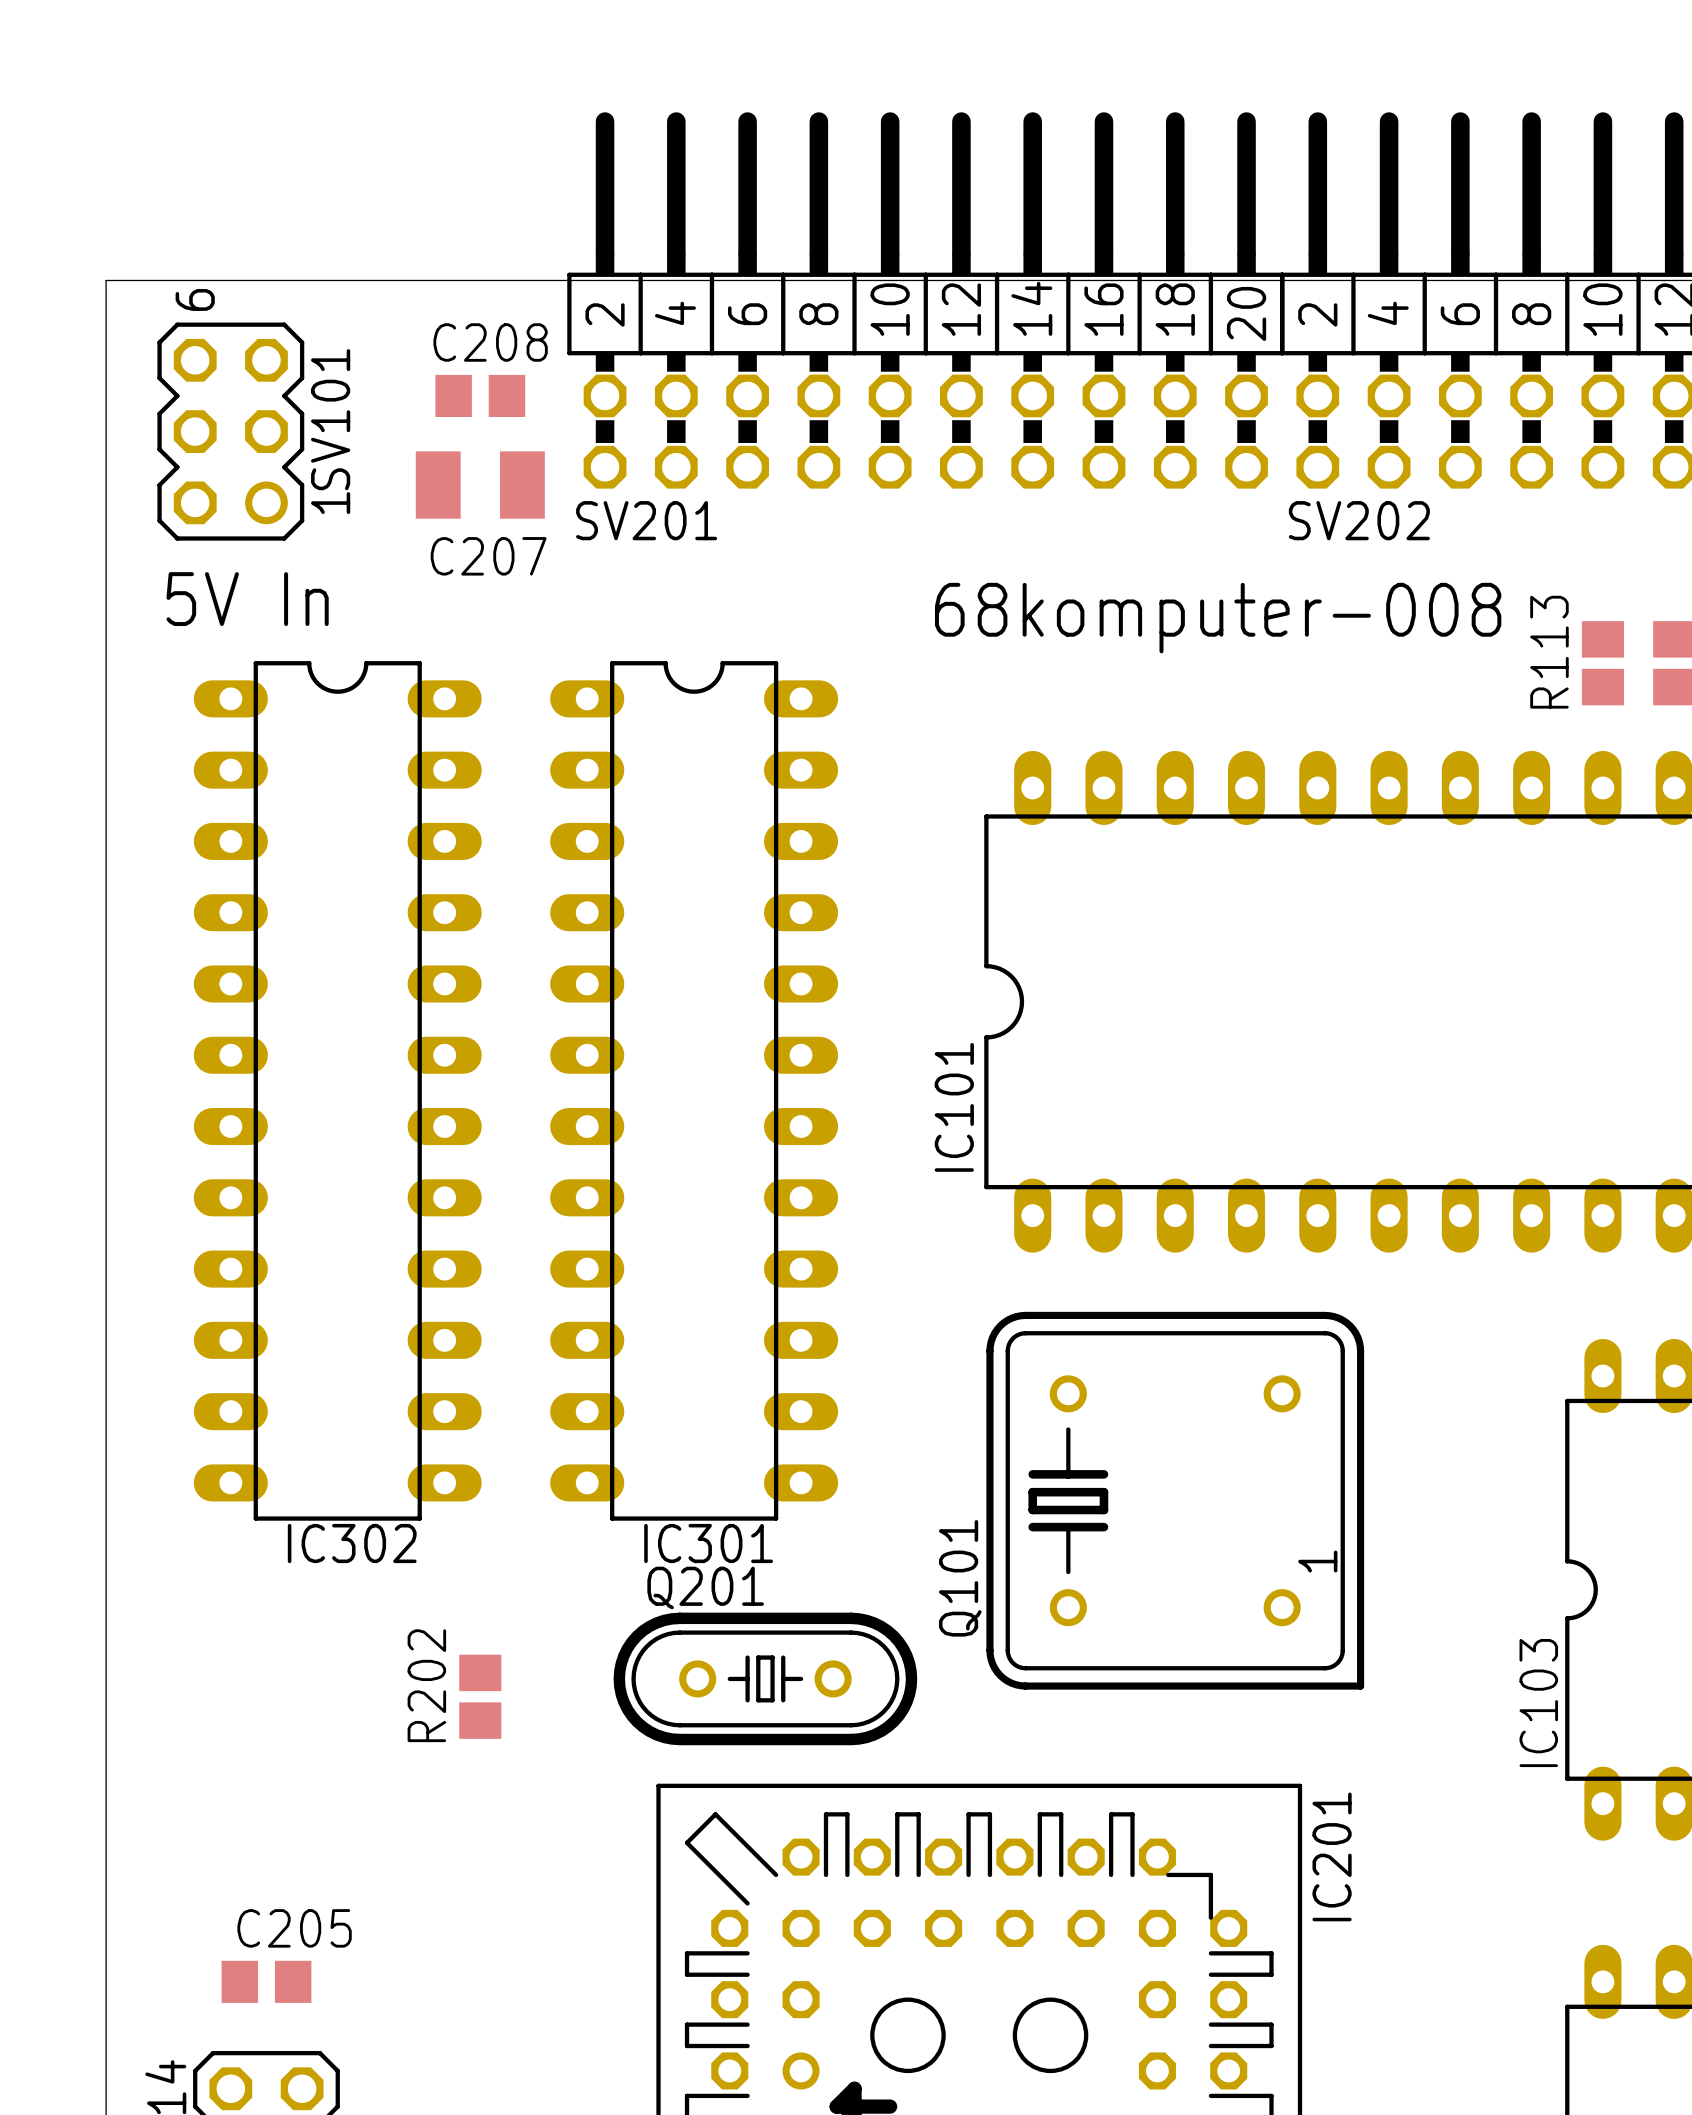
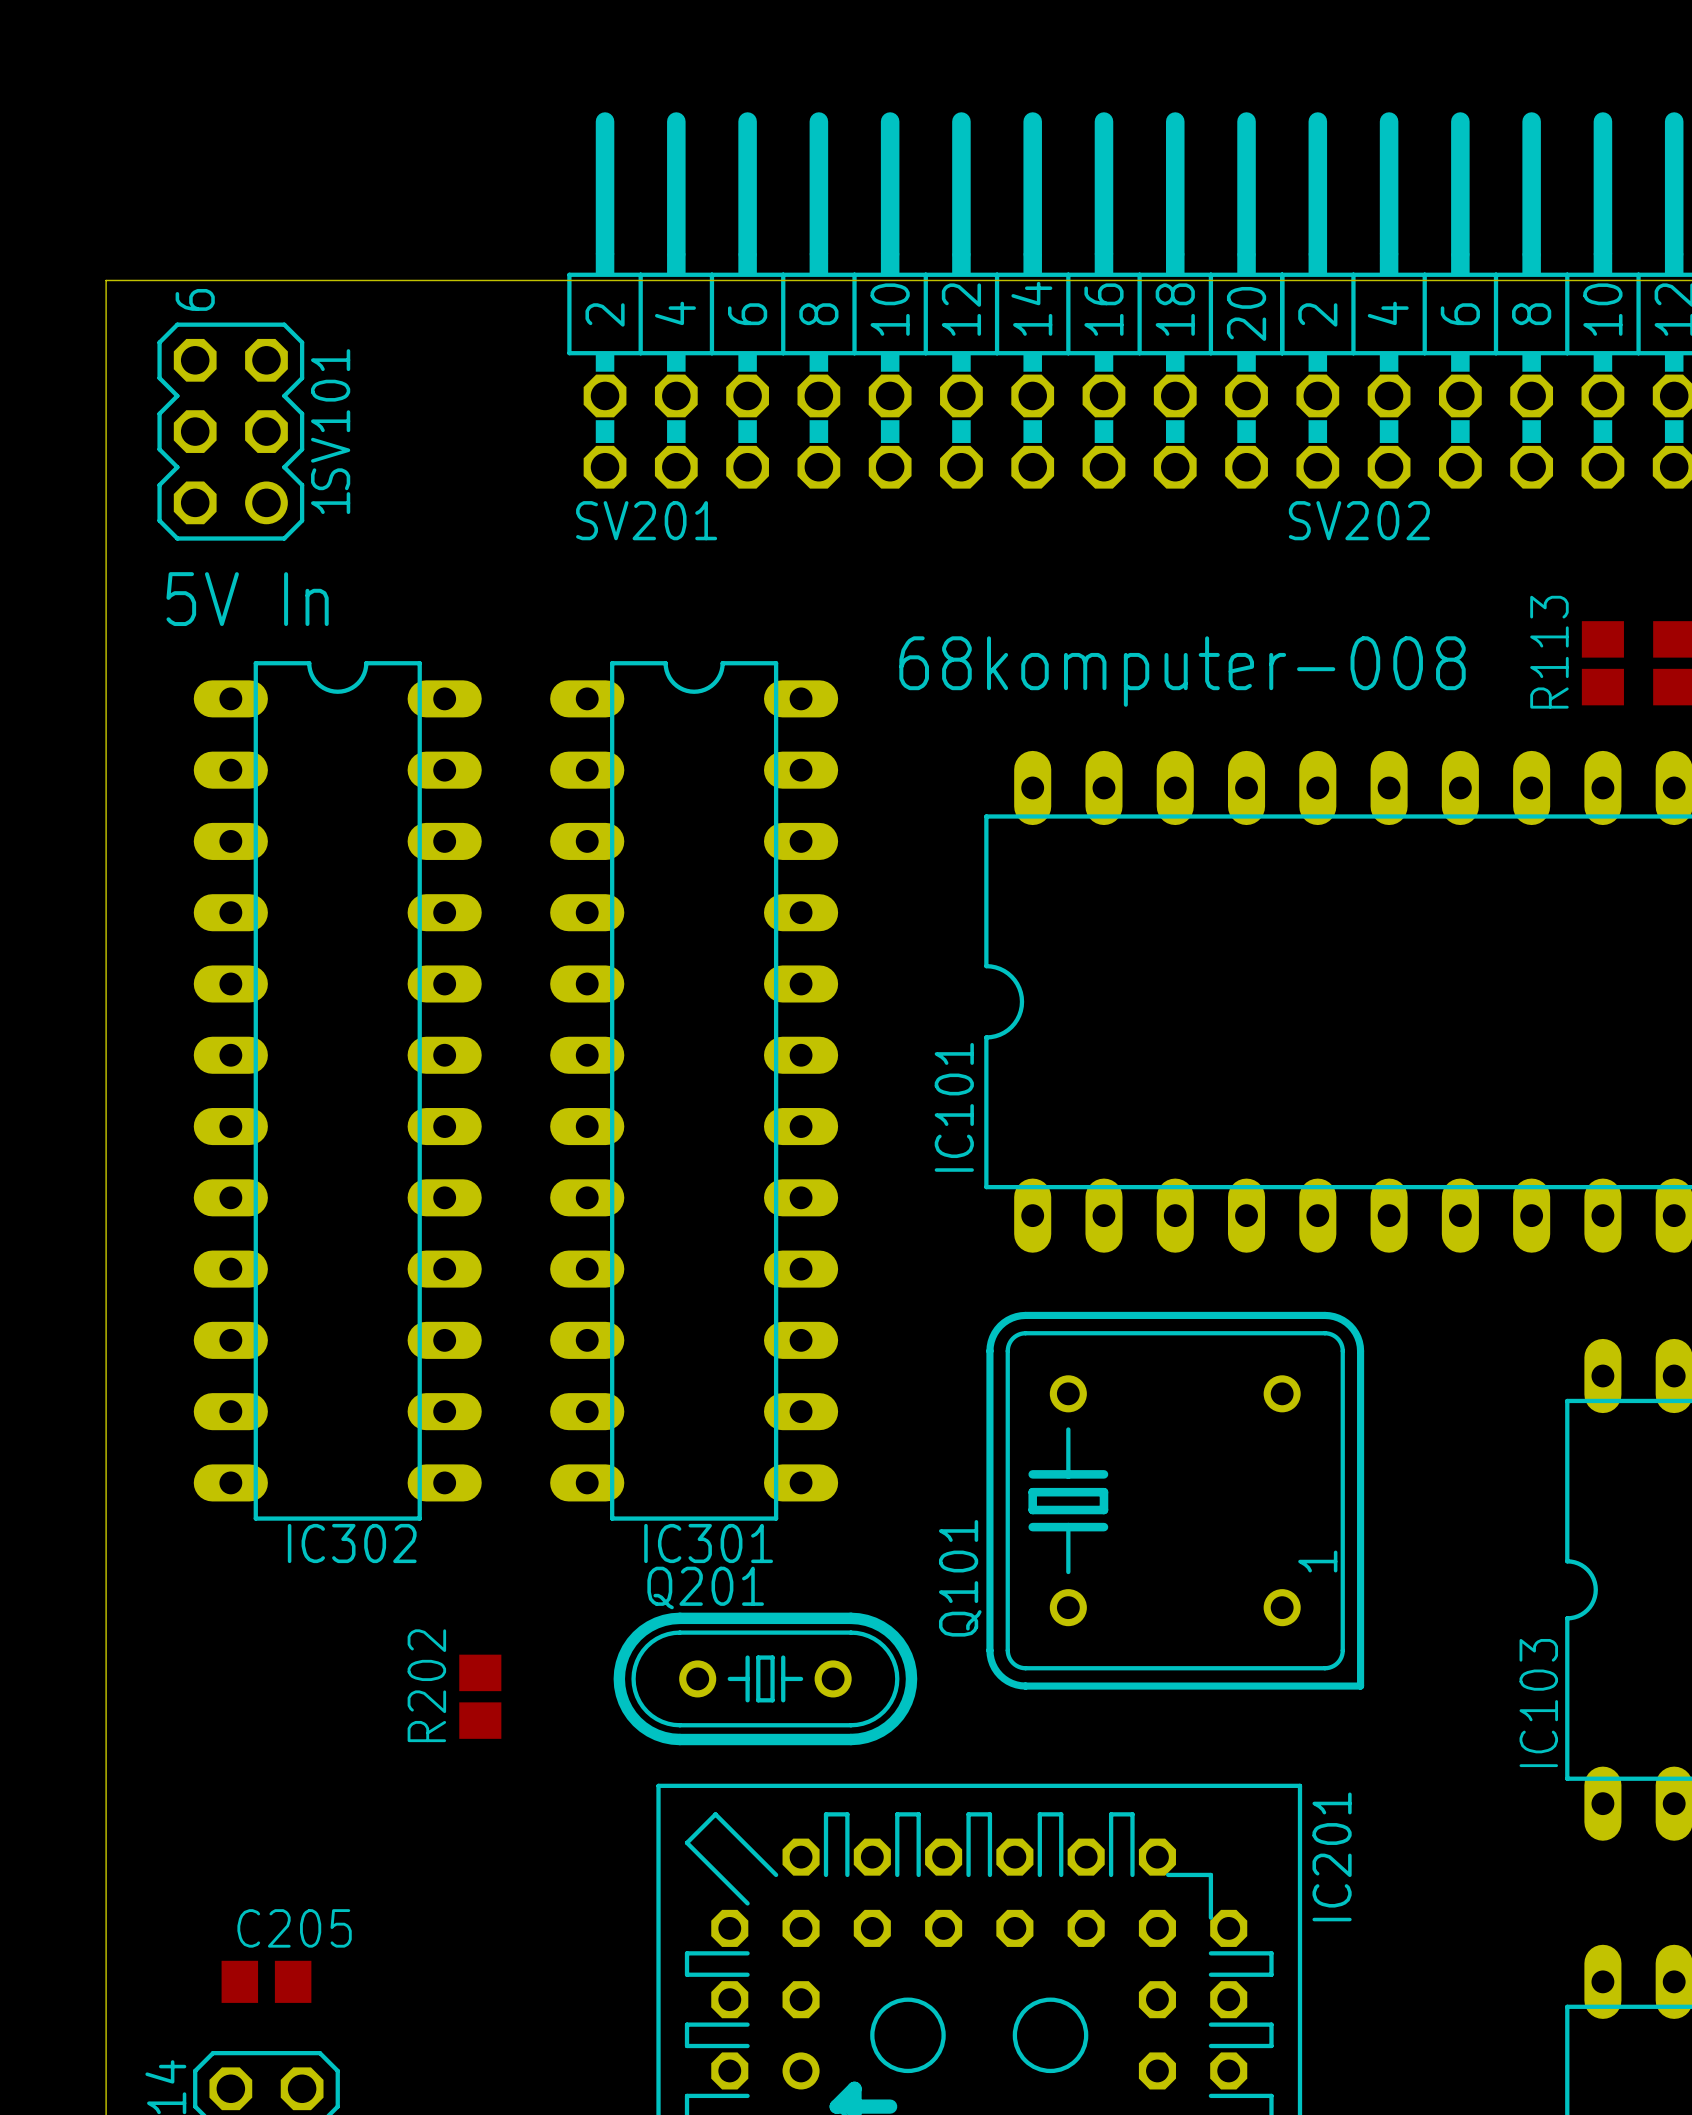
C208: (480, 395) -> none
C207: (480, 485) -> none
text position: 68komputer-008 (1218, 618) -> 68komputer-008 (1182, 671)

